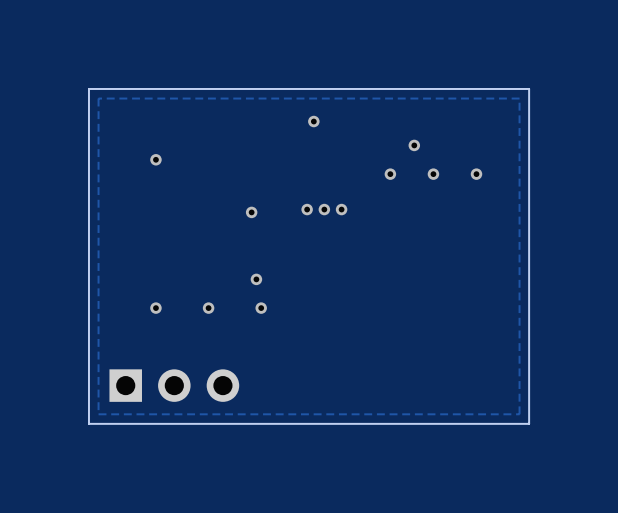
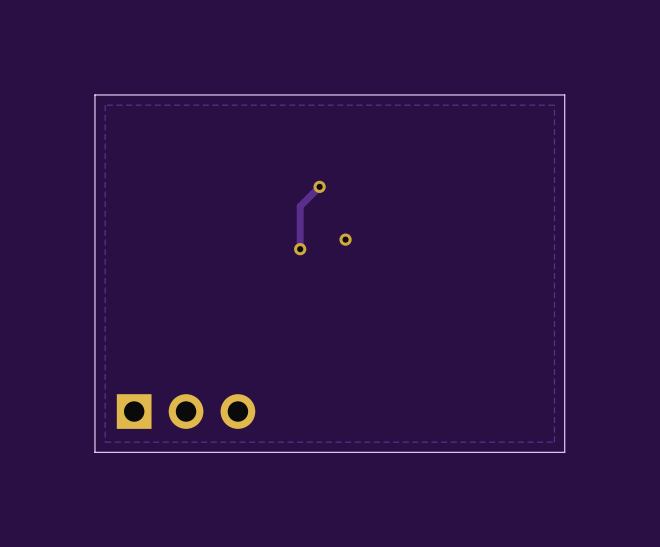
via: (313, 121) -> none
via: (414, 145) -> none
via: (155, 159) -> none
via: (390, 174) -> none
via: (433, 174) -> none
via: (476, 174) -> none
track: none -> (319, 186) (300, 206) (300, 249)
via: none -> (319, 186)
via: (307, 209) -> none
via: (324, 209) -> none
via: (341, 209) -> none
via: (251, 212) -> none
via: none -> (345, 239)
via: none -> (300, 249)
via: (256, 279) -> none
via: (155, 308) -> none
via: (208, 308) -> none
via: (261, 308) -> none

